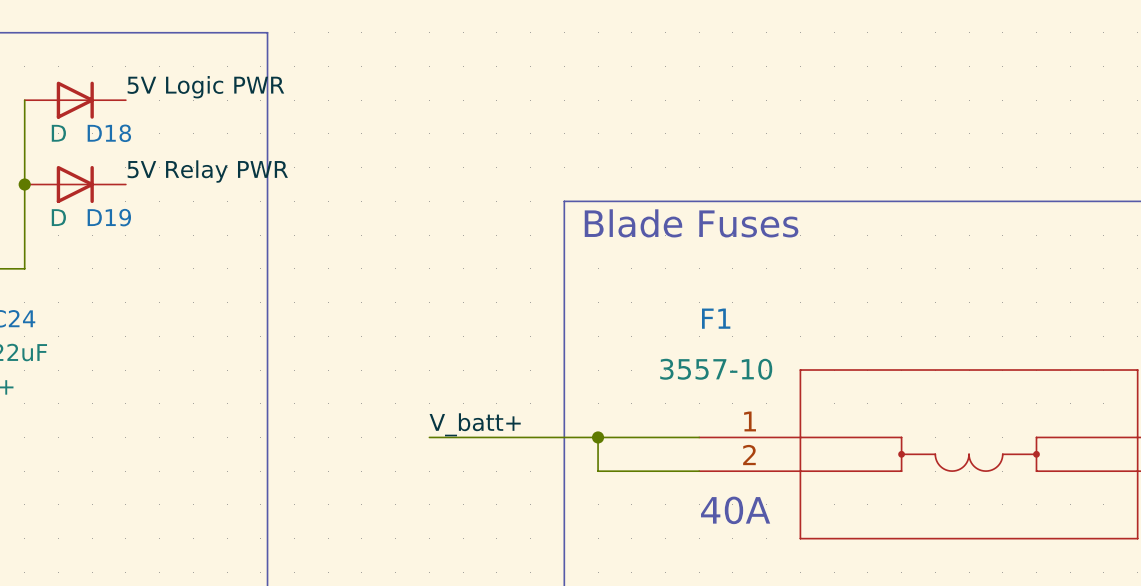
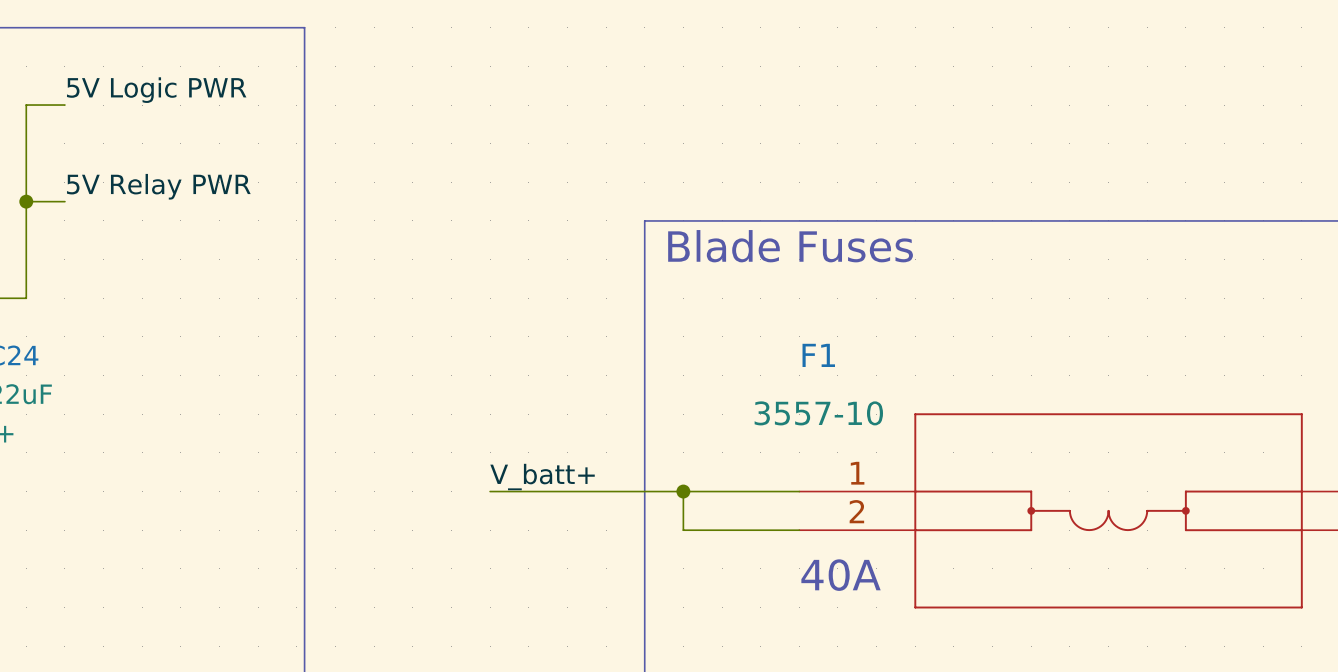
label position: 5V Logic PWR (205, 87) -> 5V Logic PWR (156, 90)
D18: D (75, 100) -> none
label position: 5V Relay PWR (207, 171) -> 5V Relay PWR (158, 186)
D19: D (75, 184) -> none

